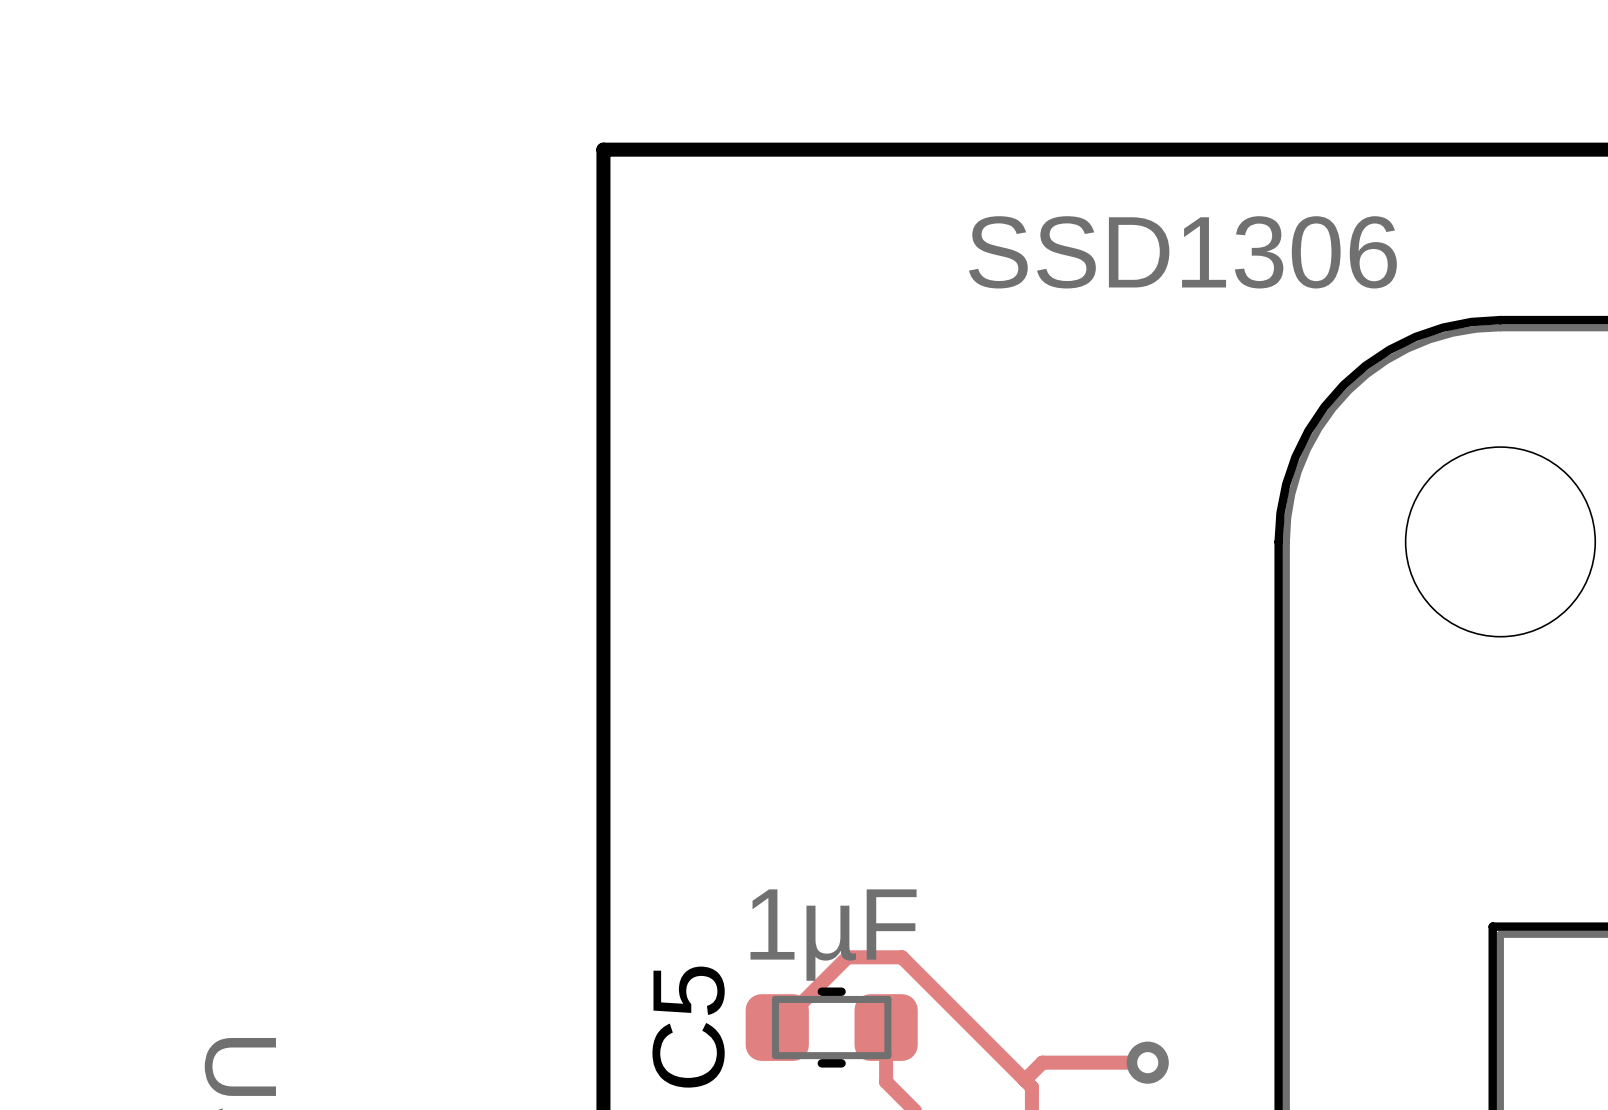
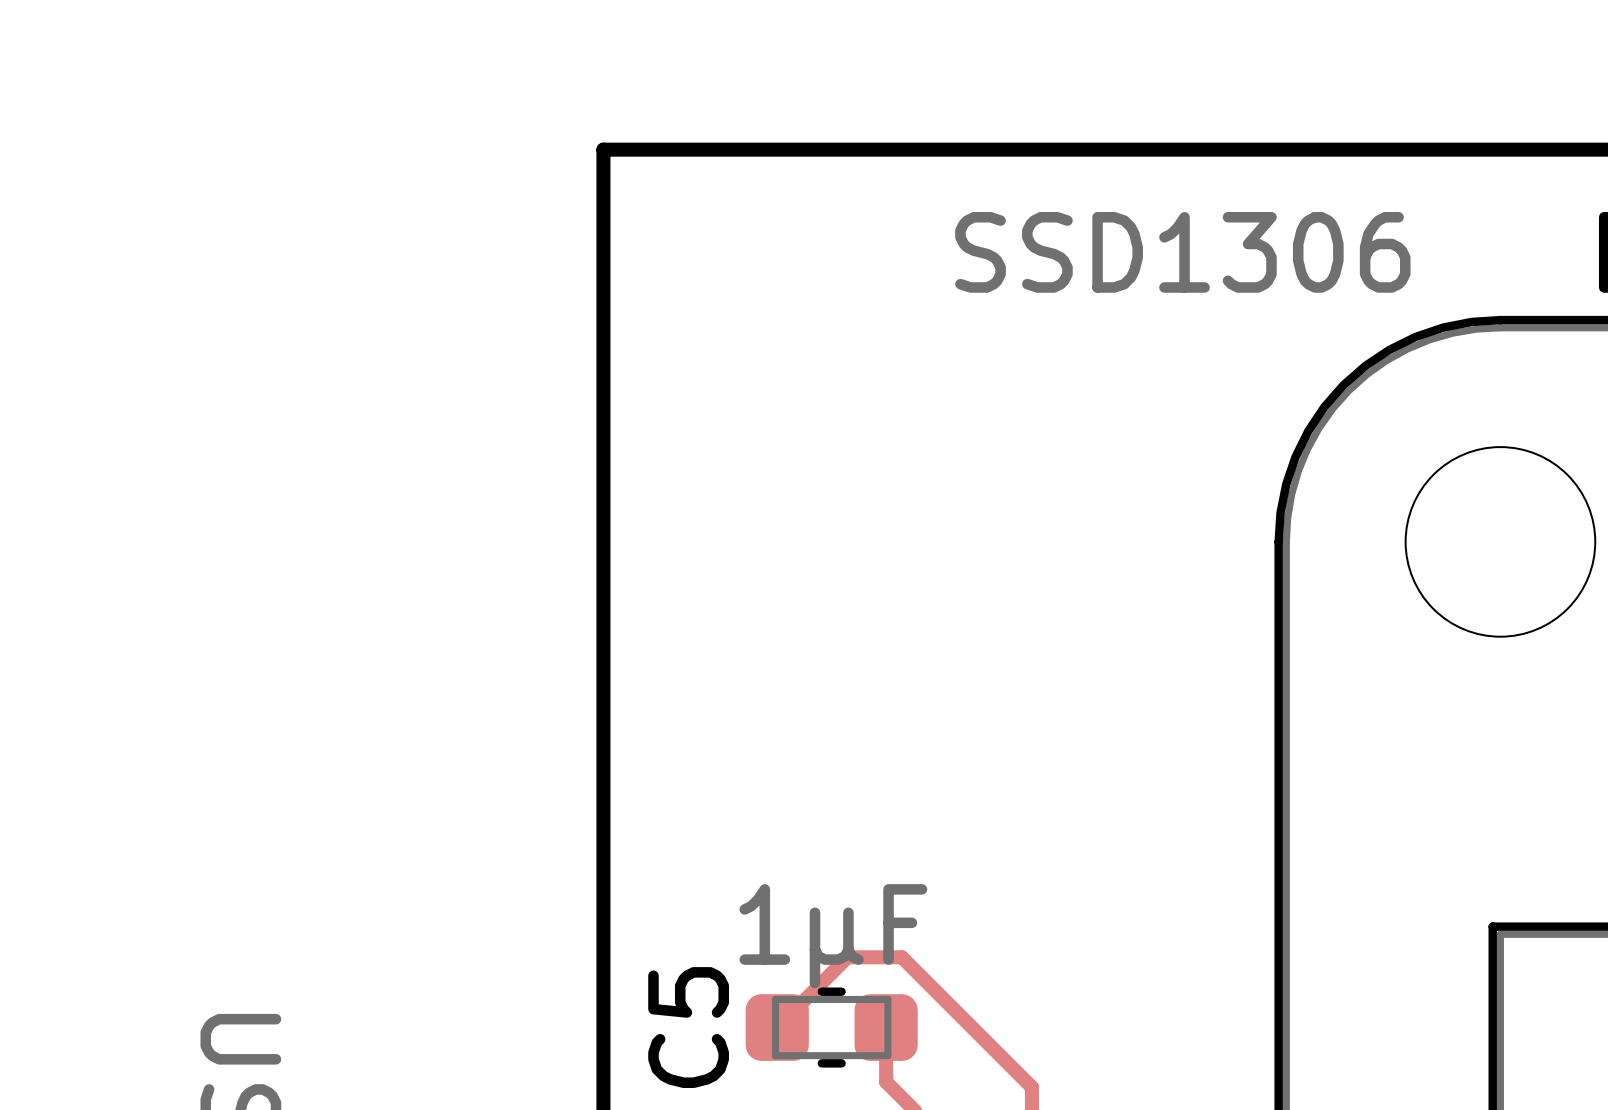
top track: (1147, 1062) (1042, 1062) (1024, 1080) -> none
via: (1147, 1062) -> none

